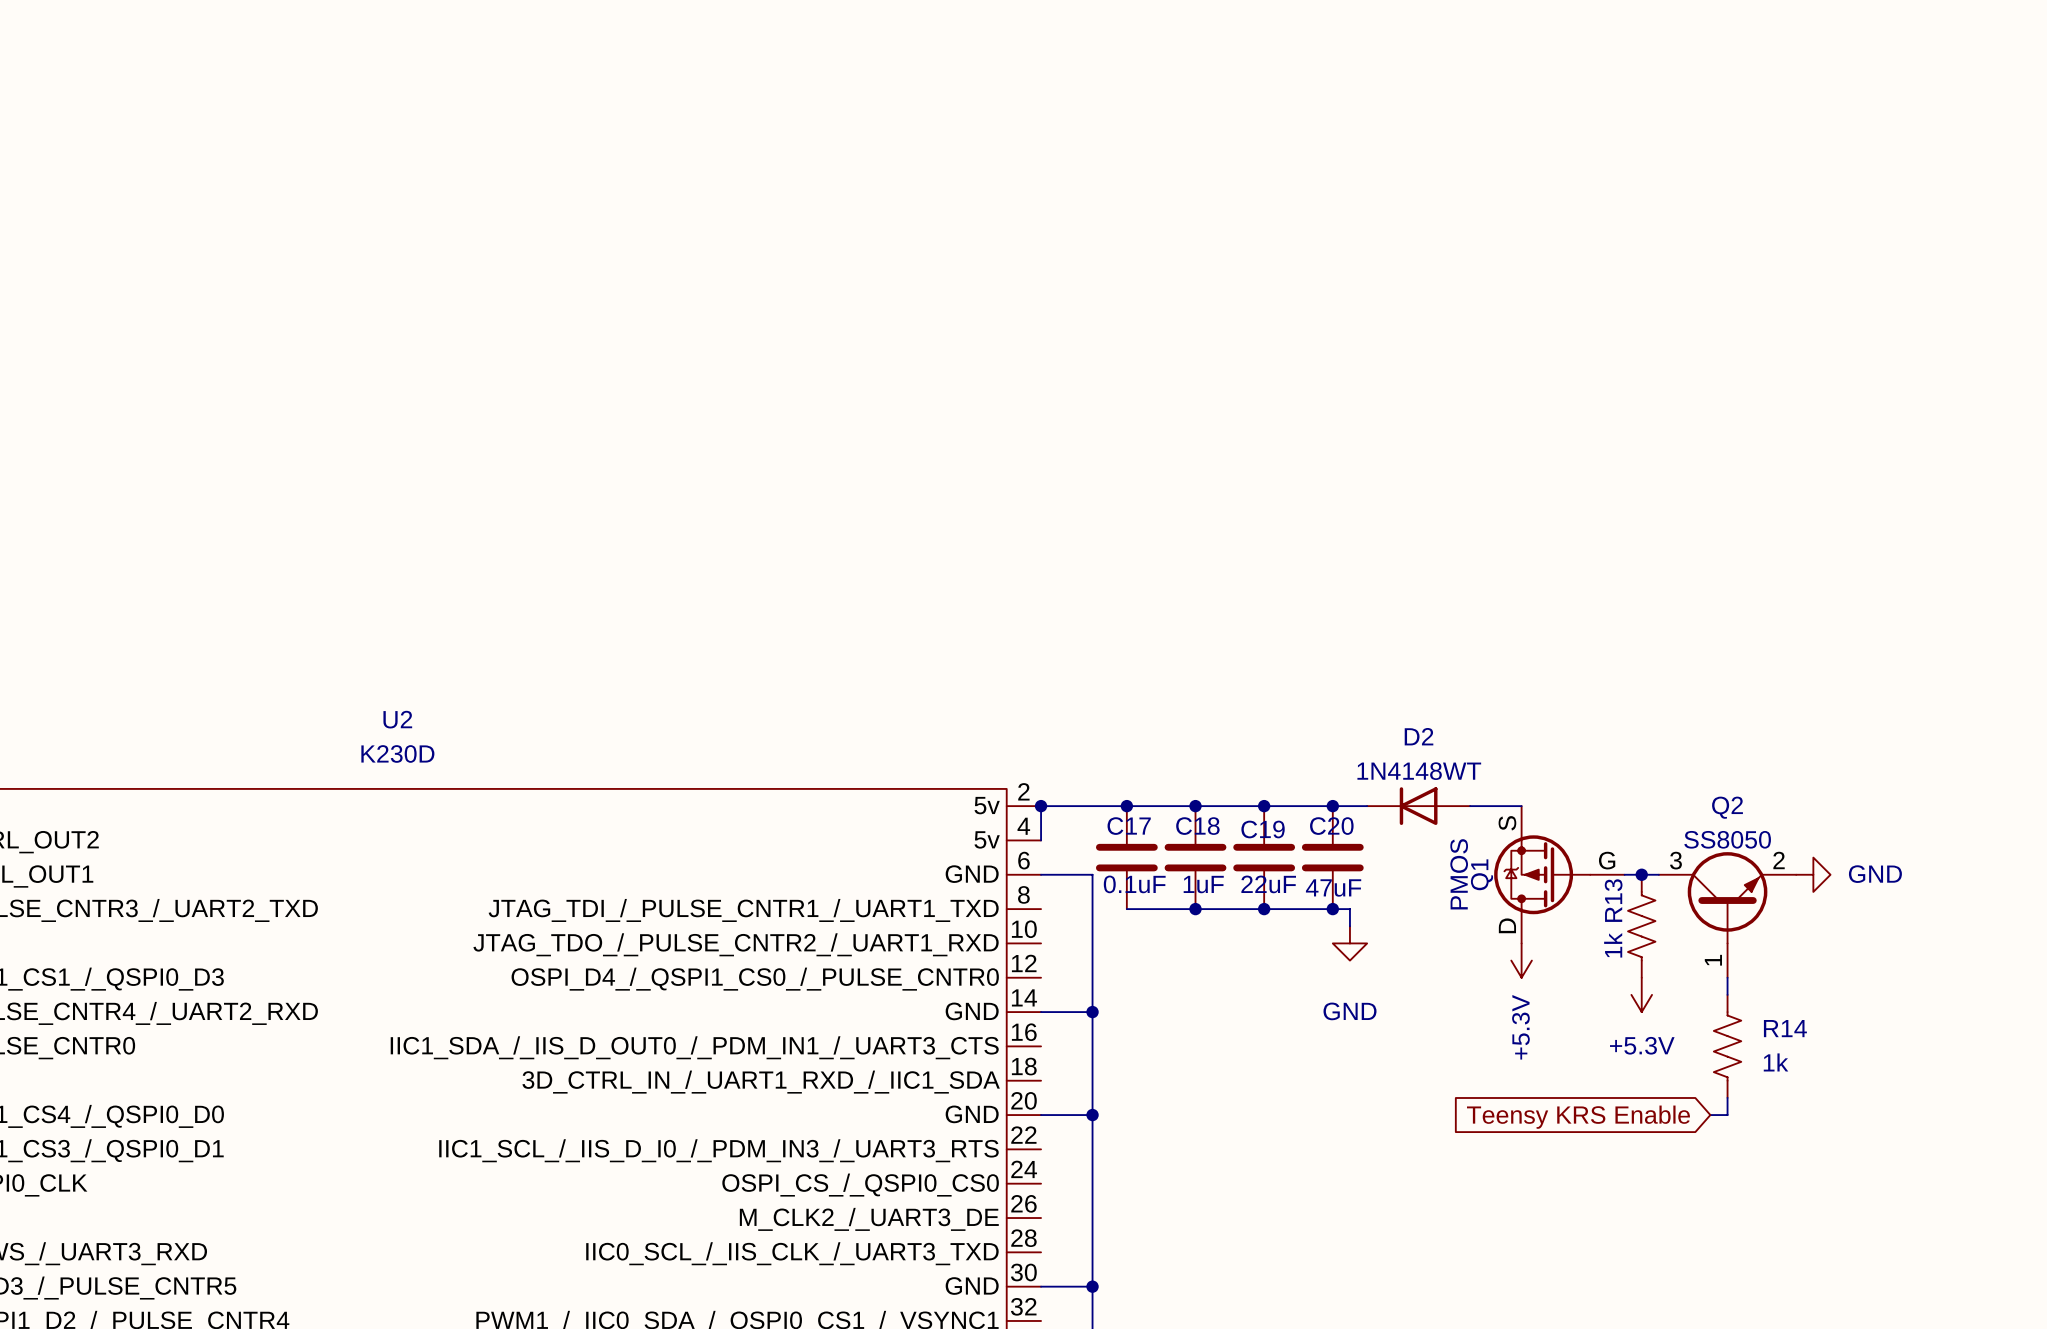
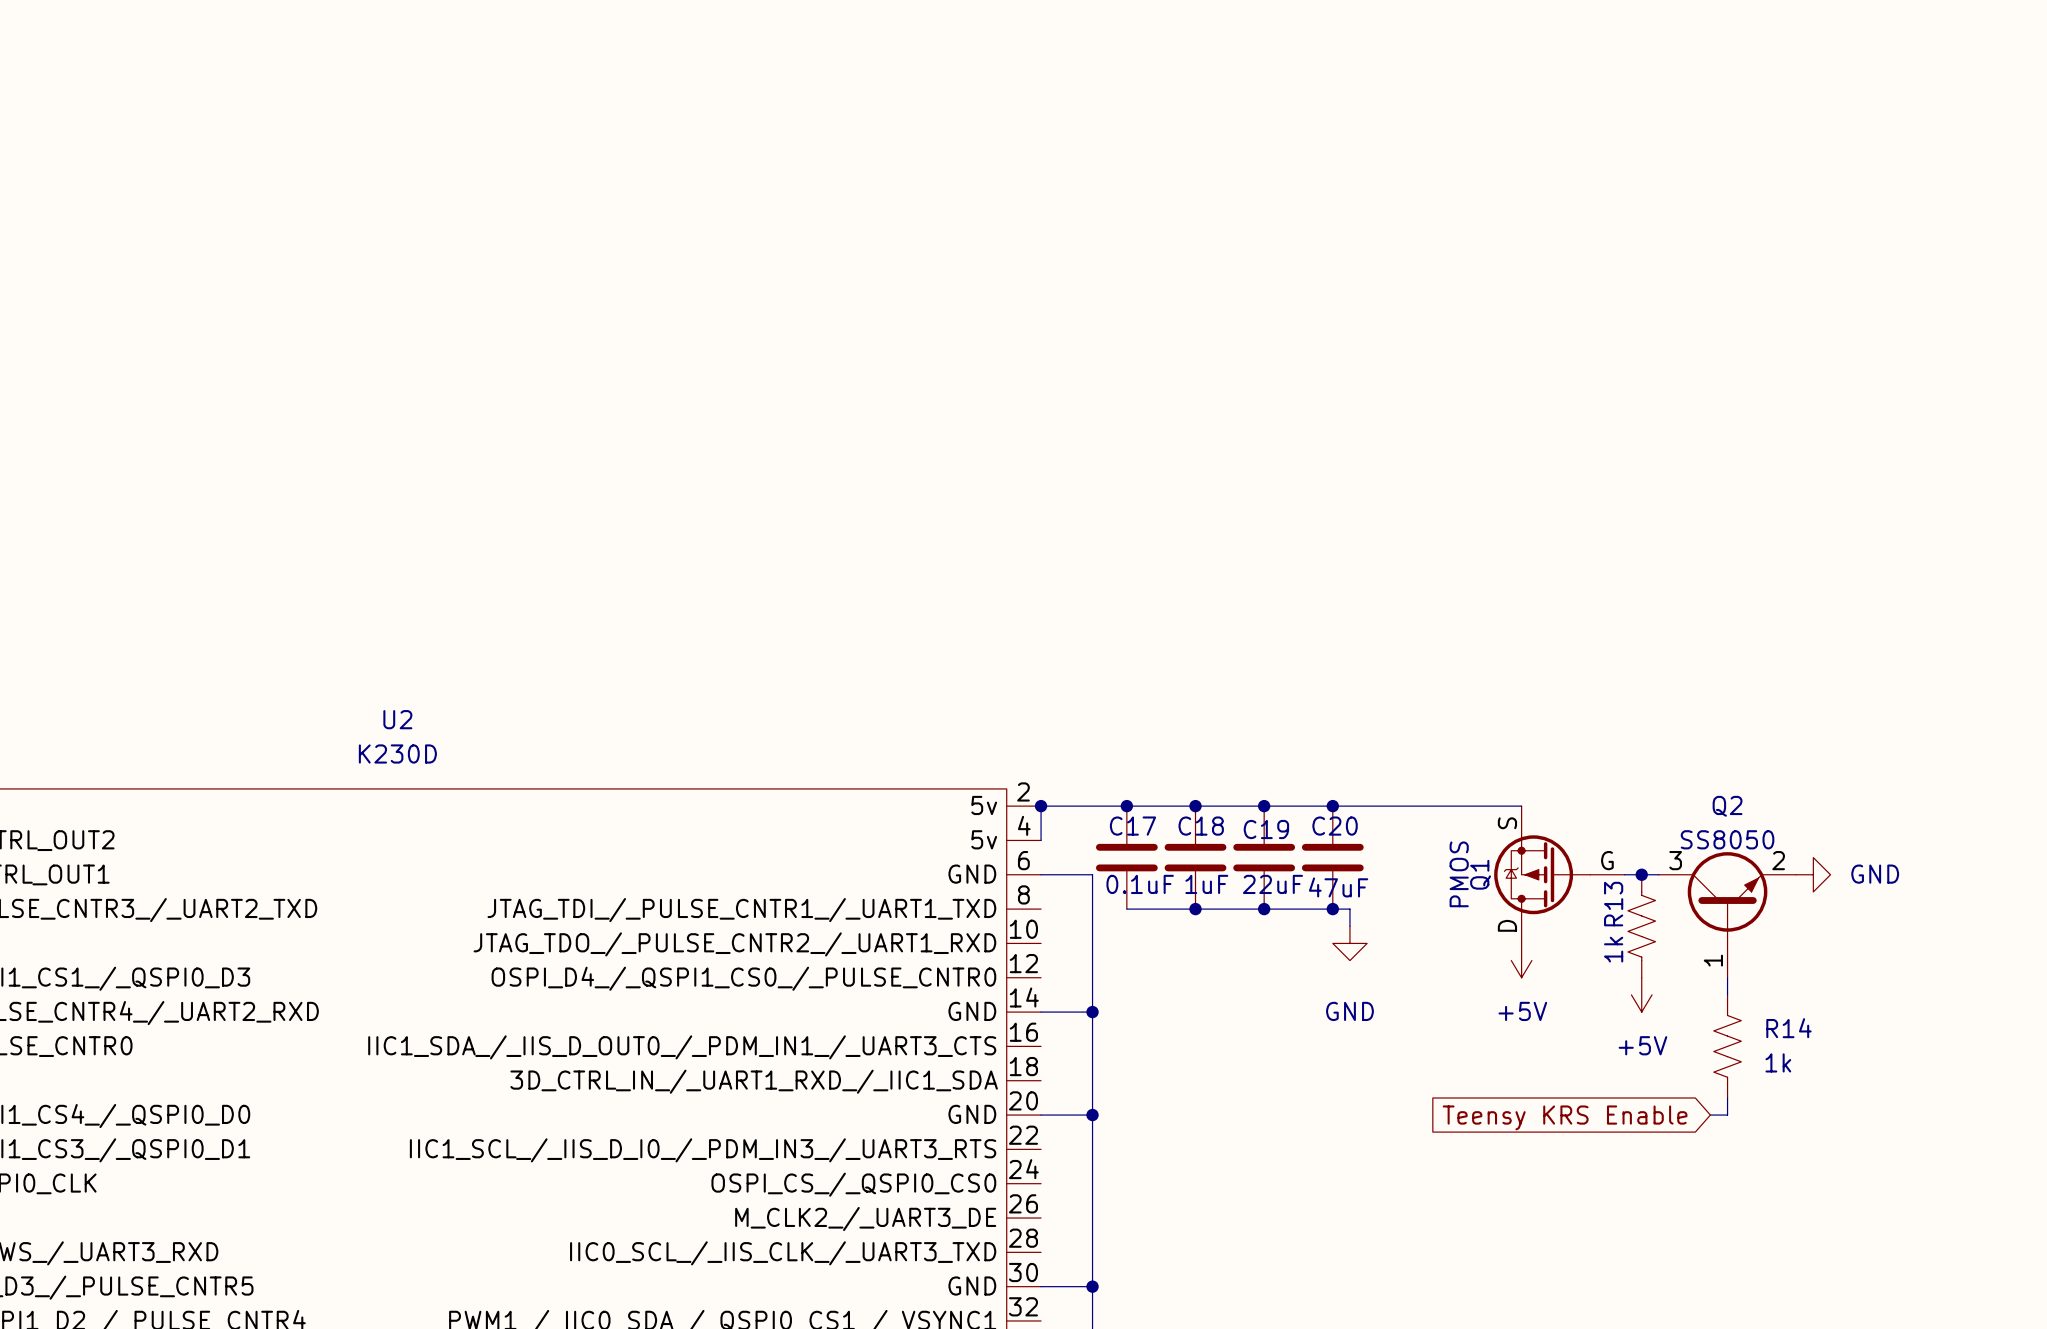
D2: 1N4148WT (1418, 806) -> none
power symbol: +5.3V (1521, 960) -> +5V (1521, 960)
power symbol: +5.3V (1641, 994) -> +5V (1641, 994)

